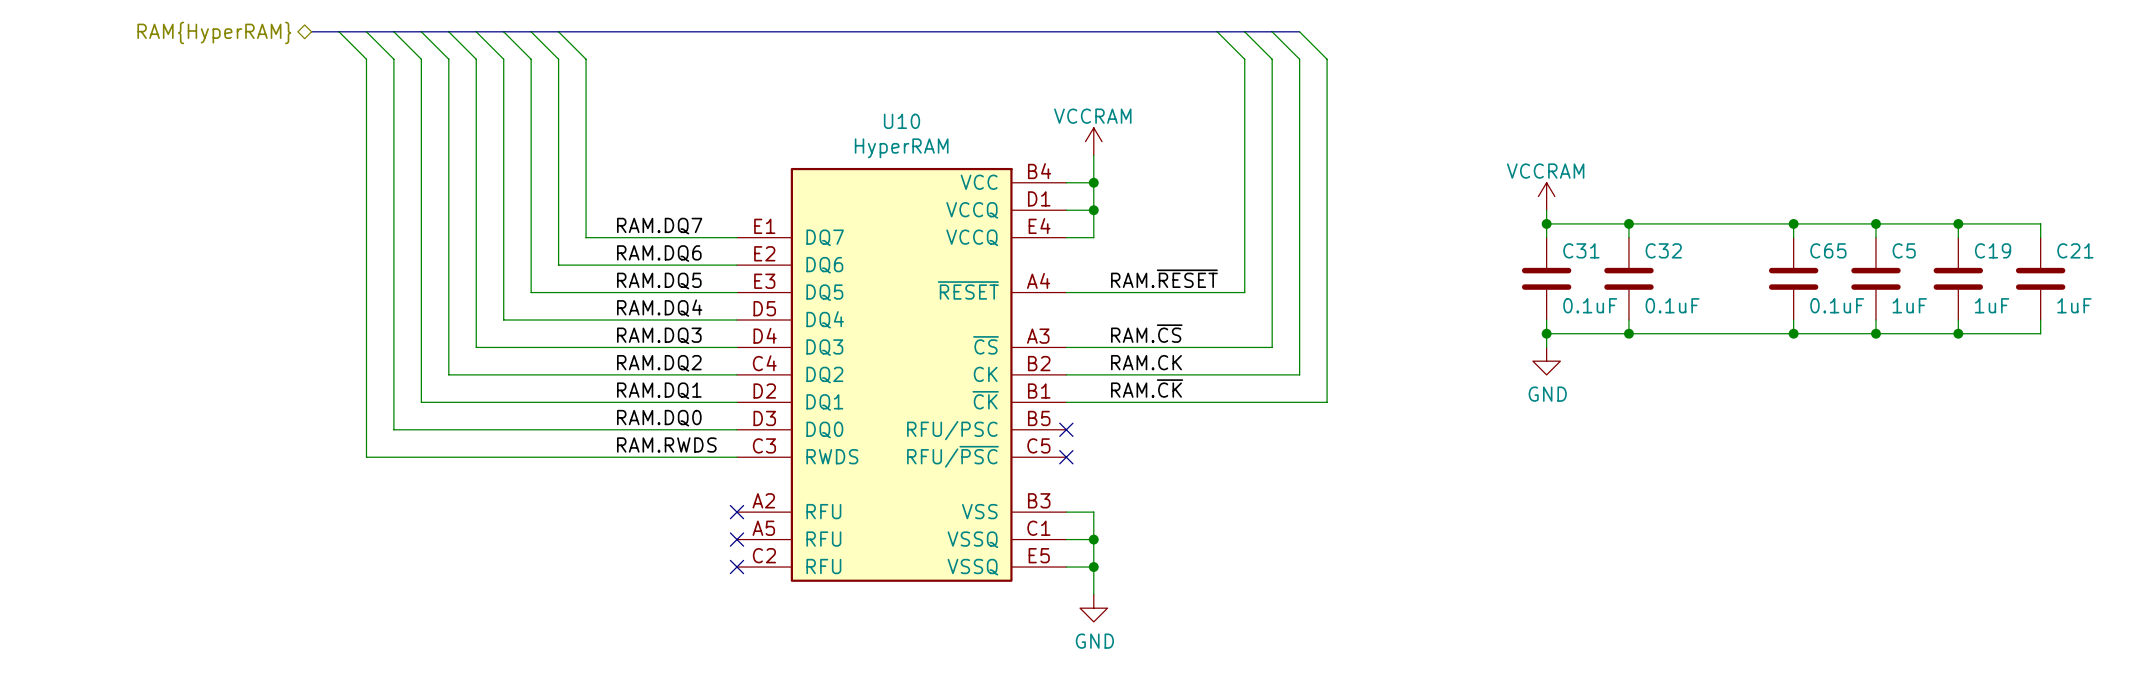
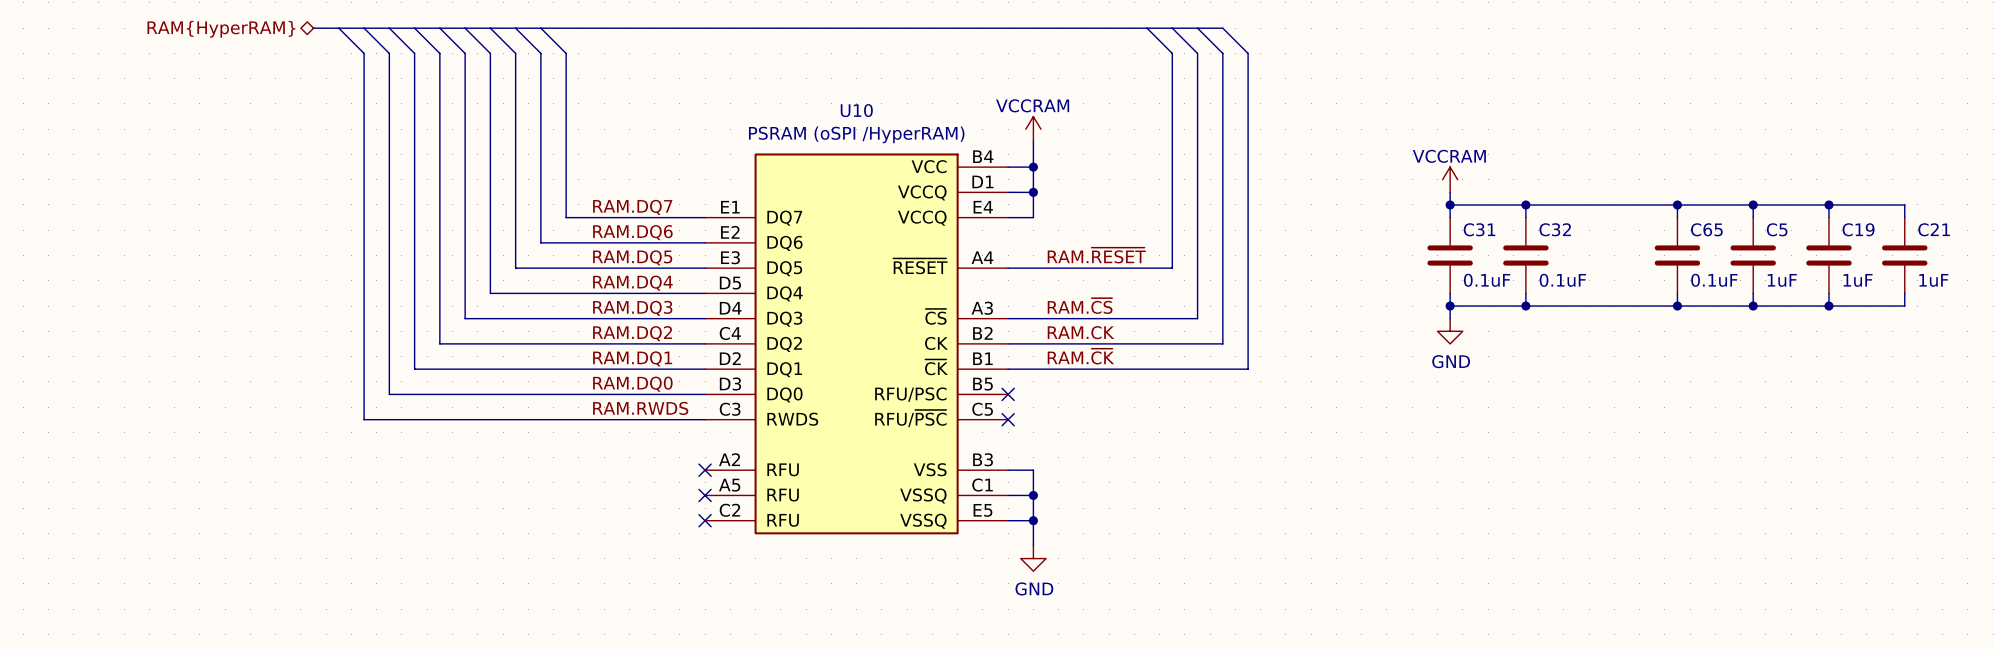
U10 value: HyperRAM (901, 148) -> PSRAM (oSPI /HyperRAM) (856, 134)

